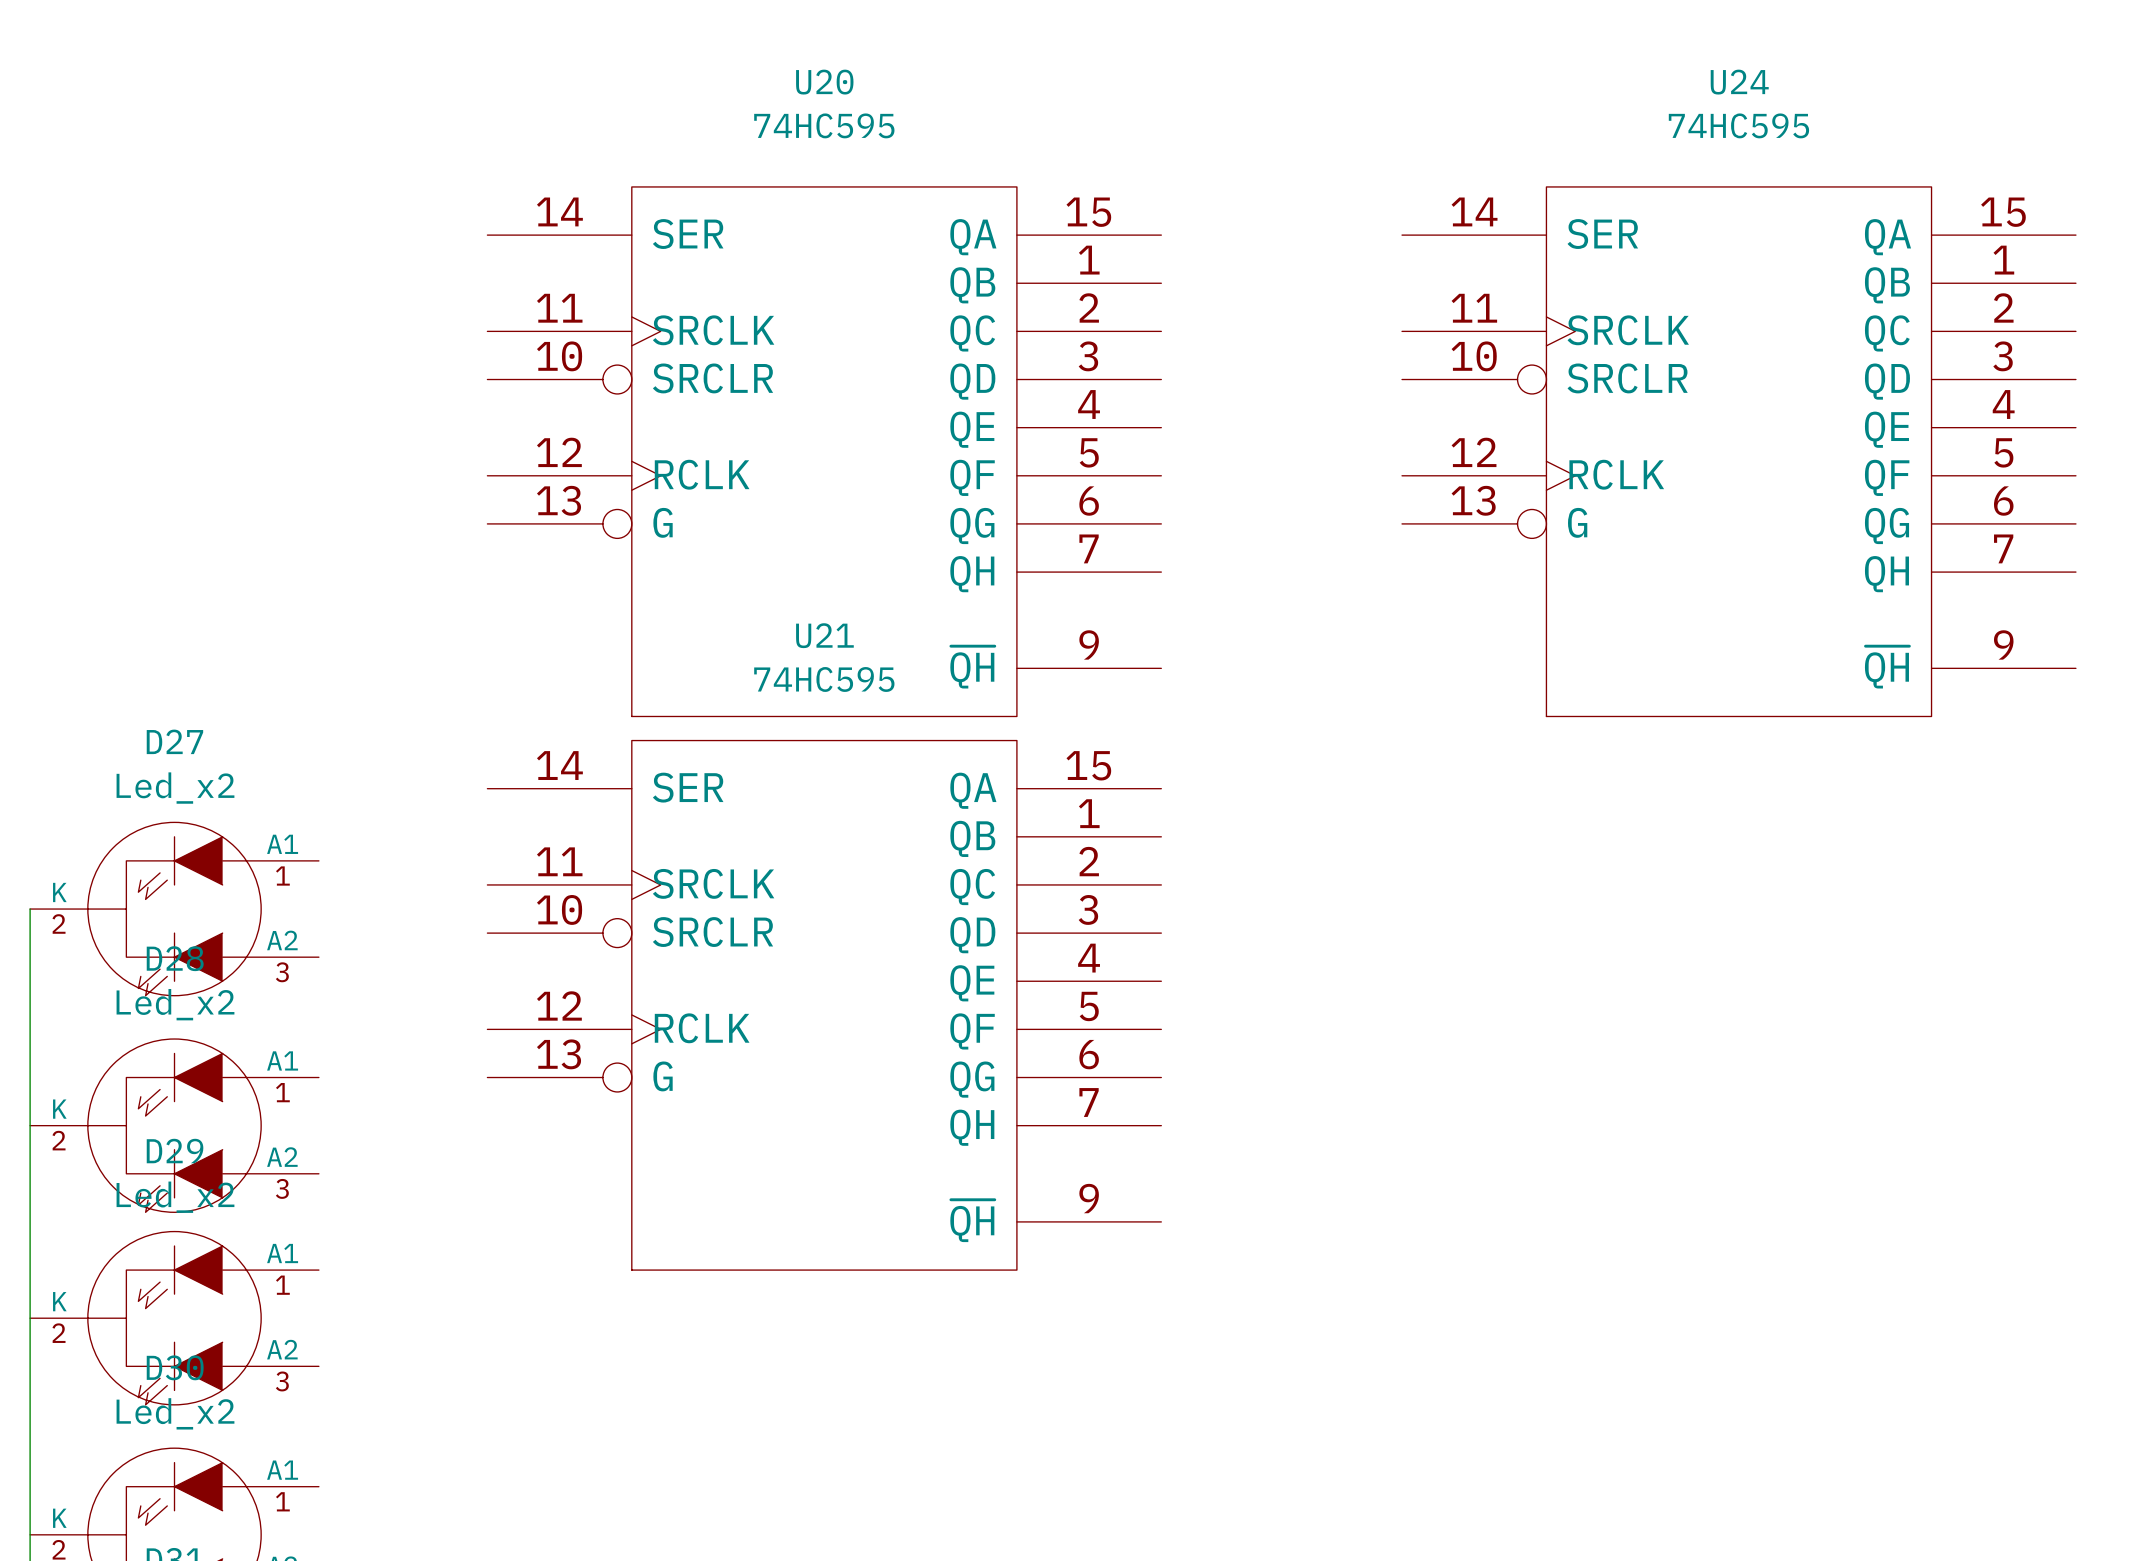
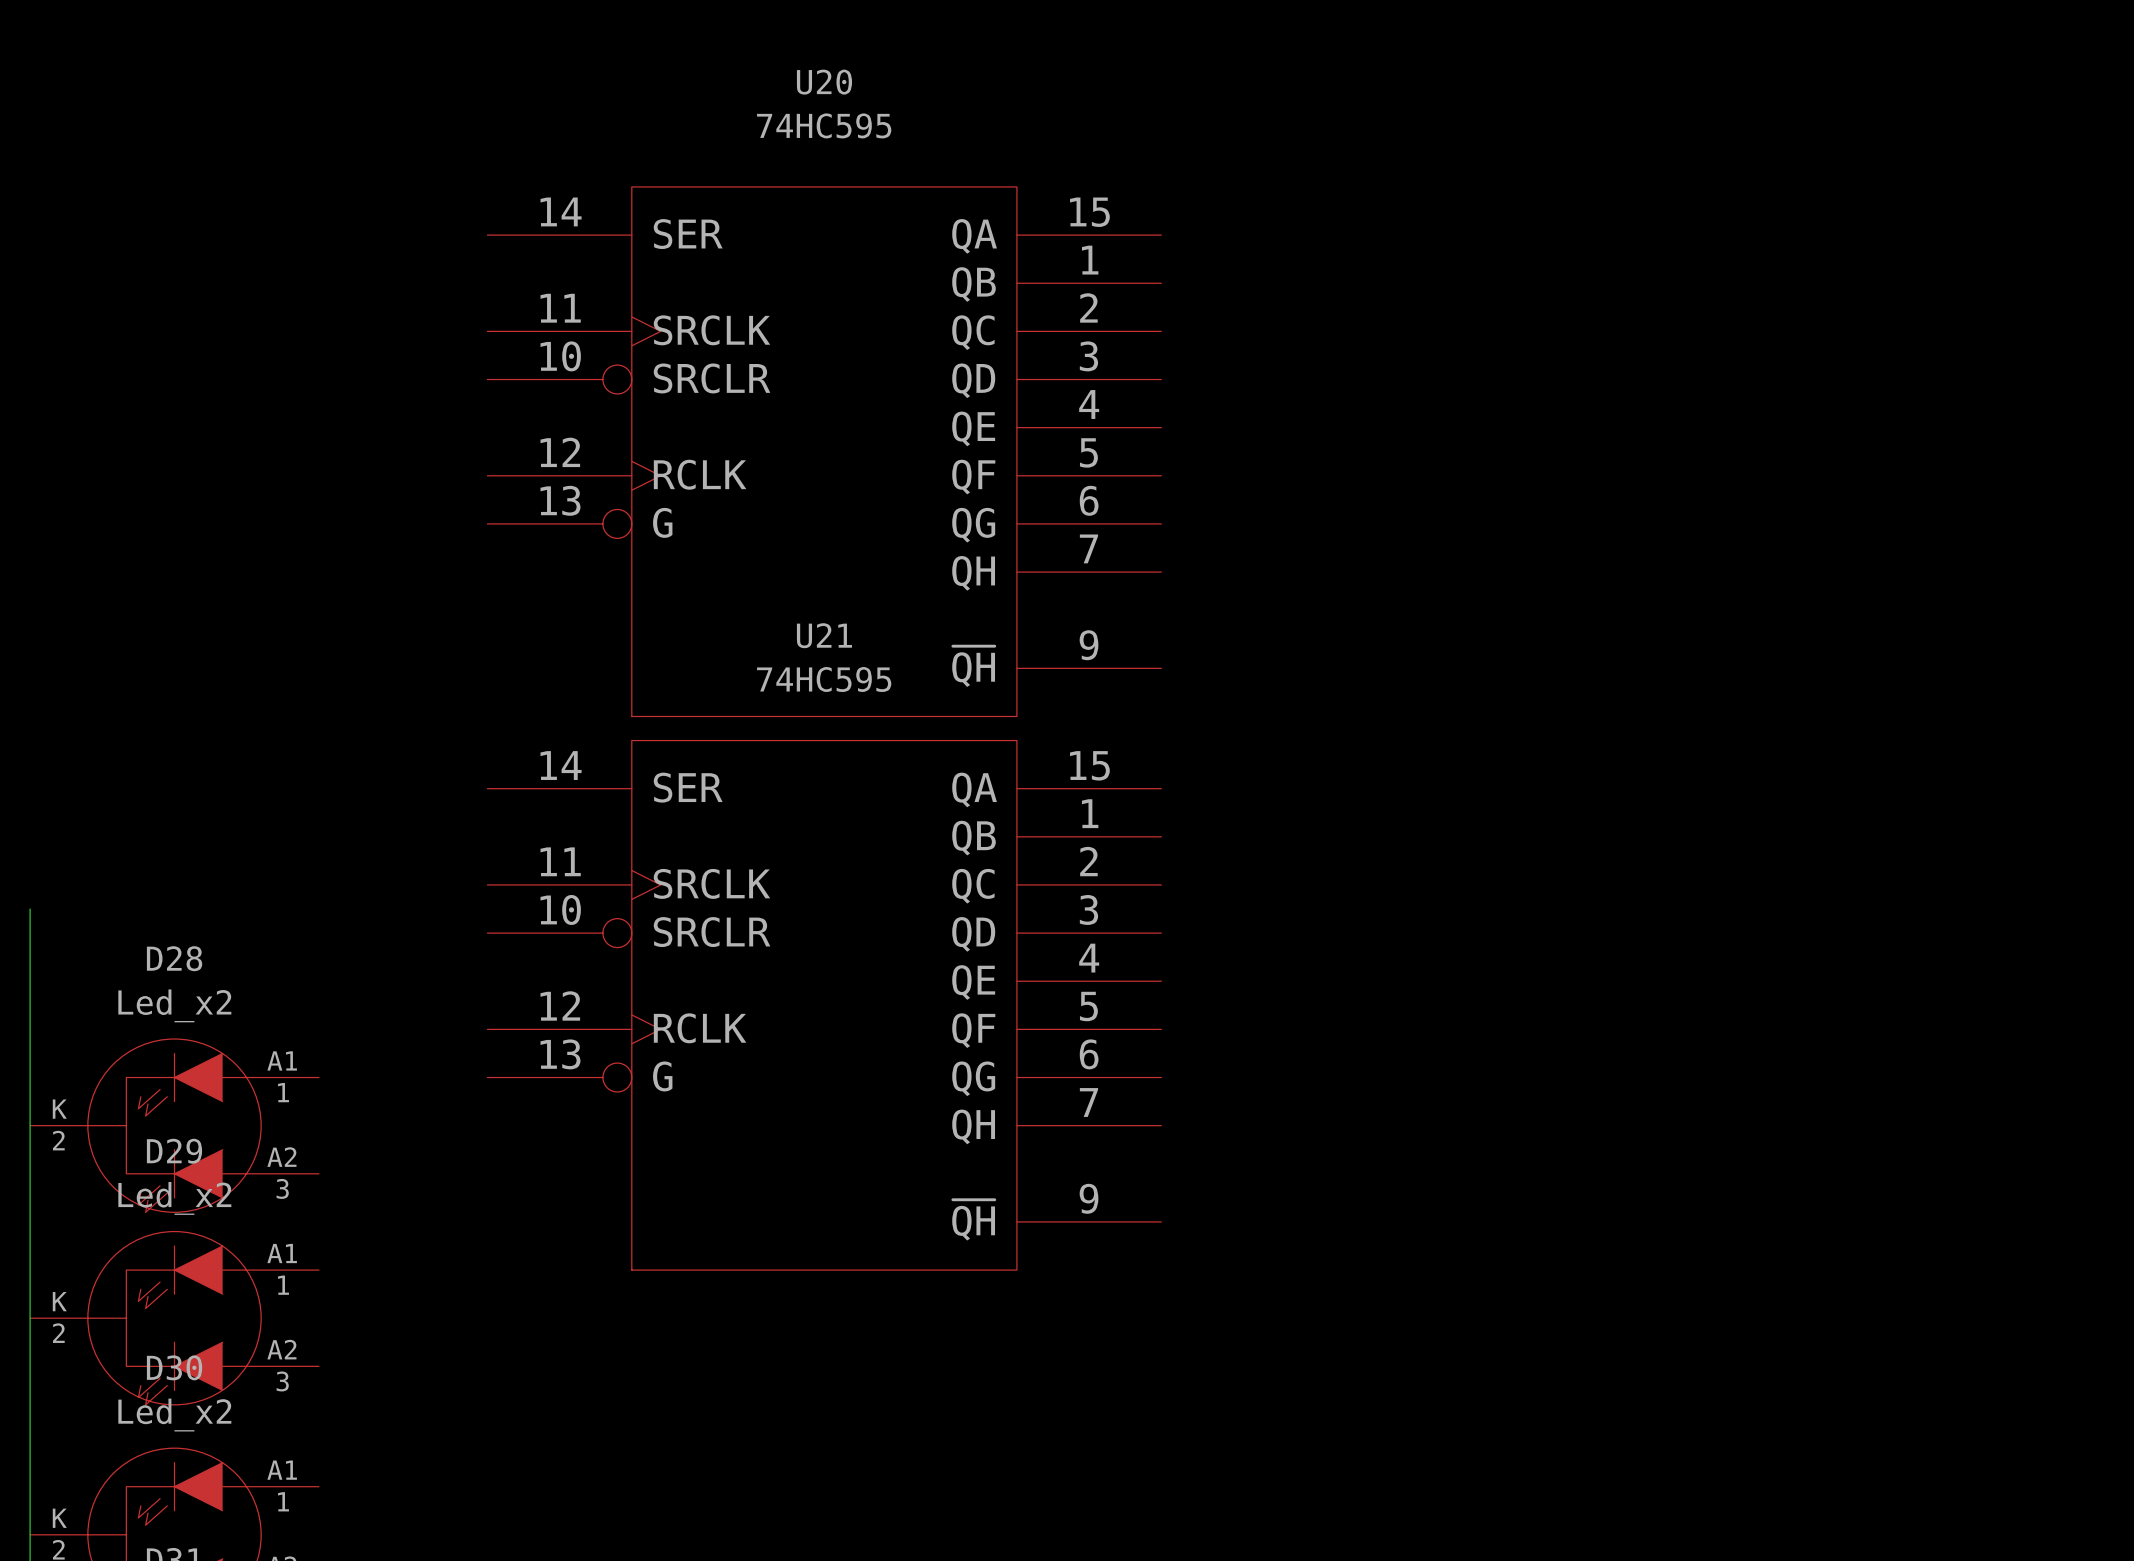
U24: 74HC595 (1738, 451) -> none
D27: Led_x2 (174, 909) -> none

